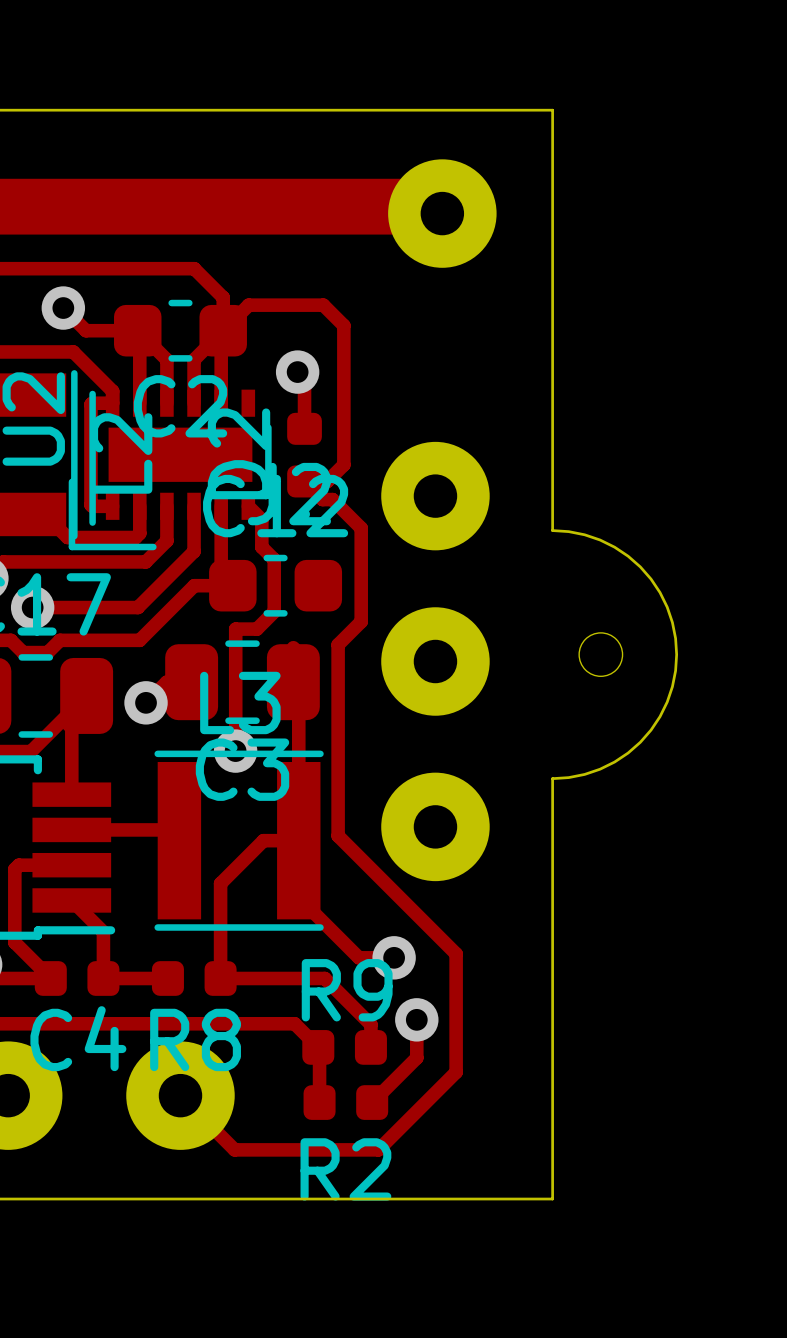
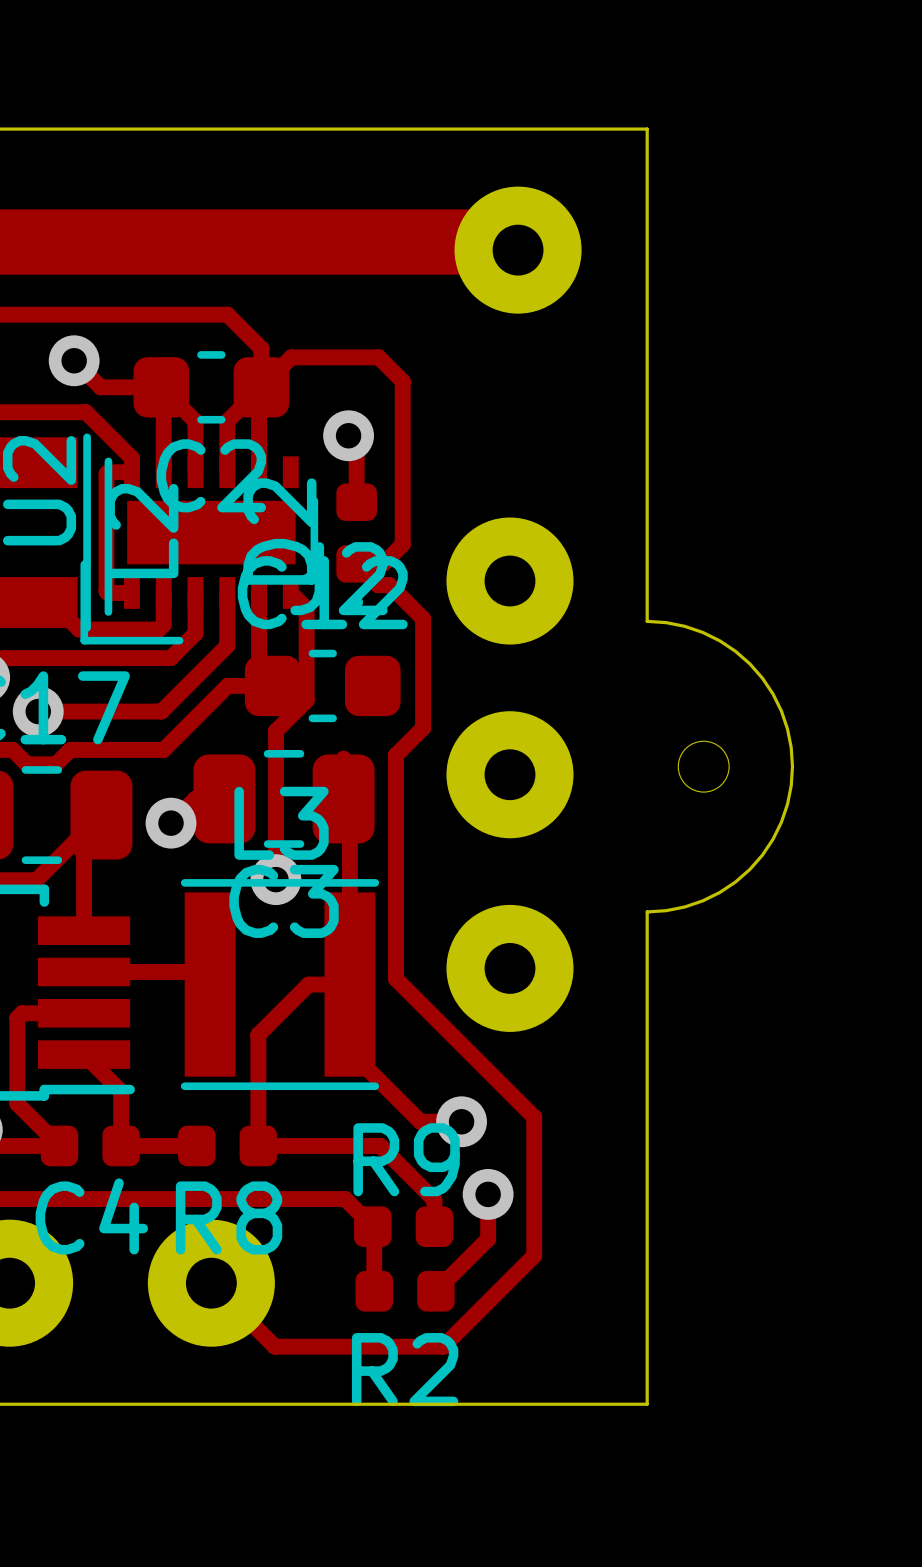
track: (261, 547) (274, 559) (274, 611) (256, 629) (235, 629) -> (306, 640) (306, 700) (276, 730) (276, 736)

